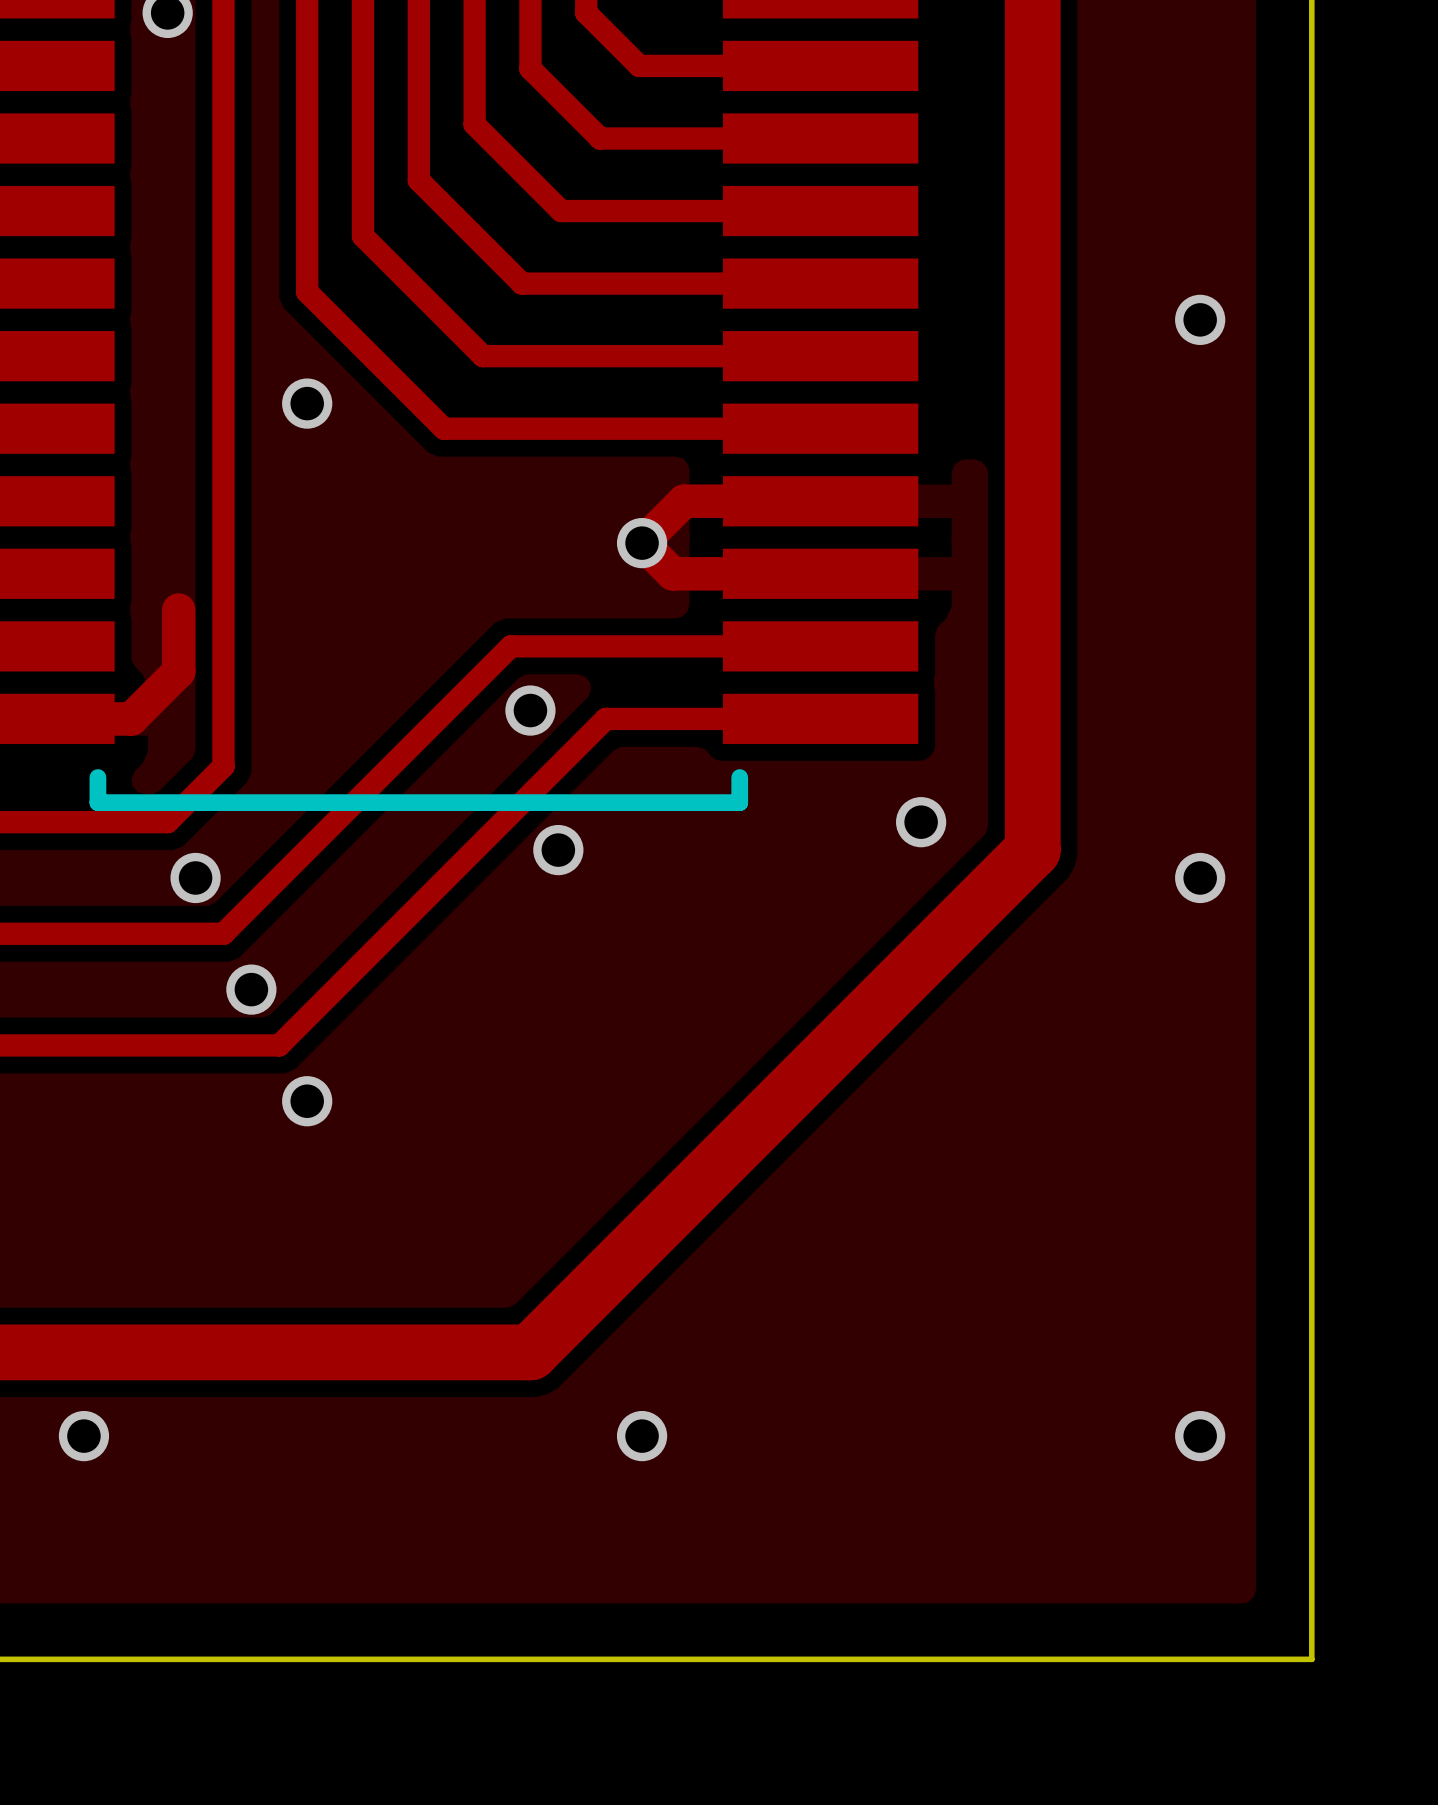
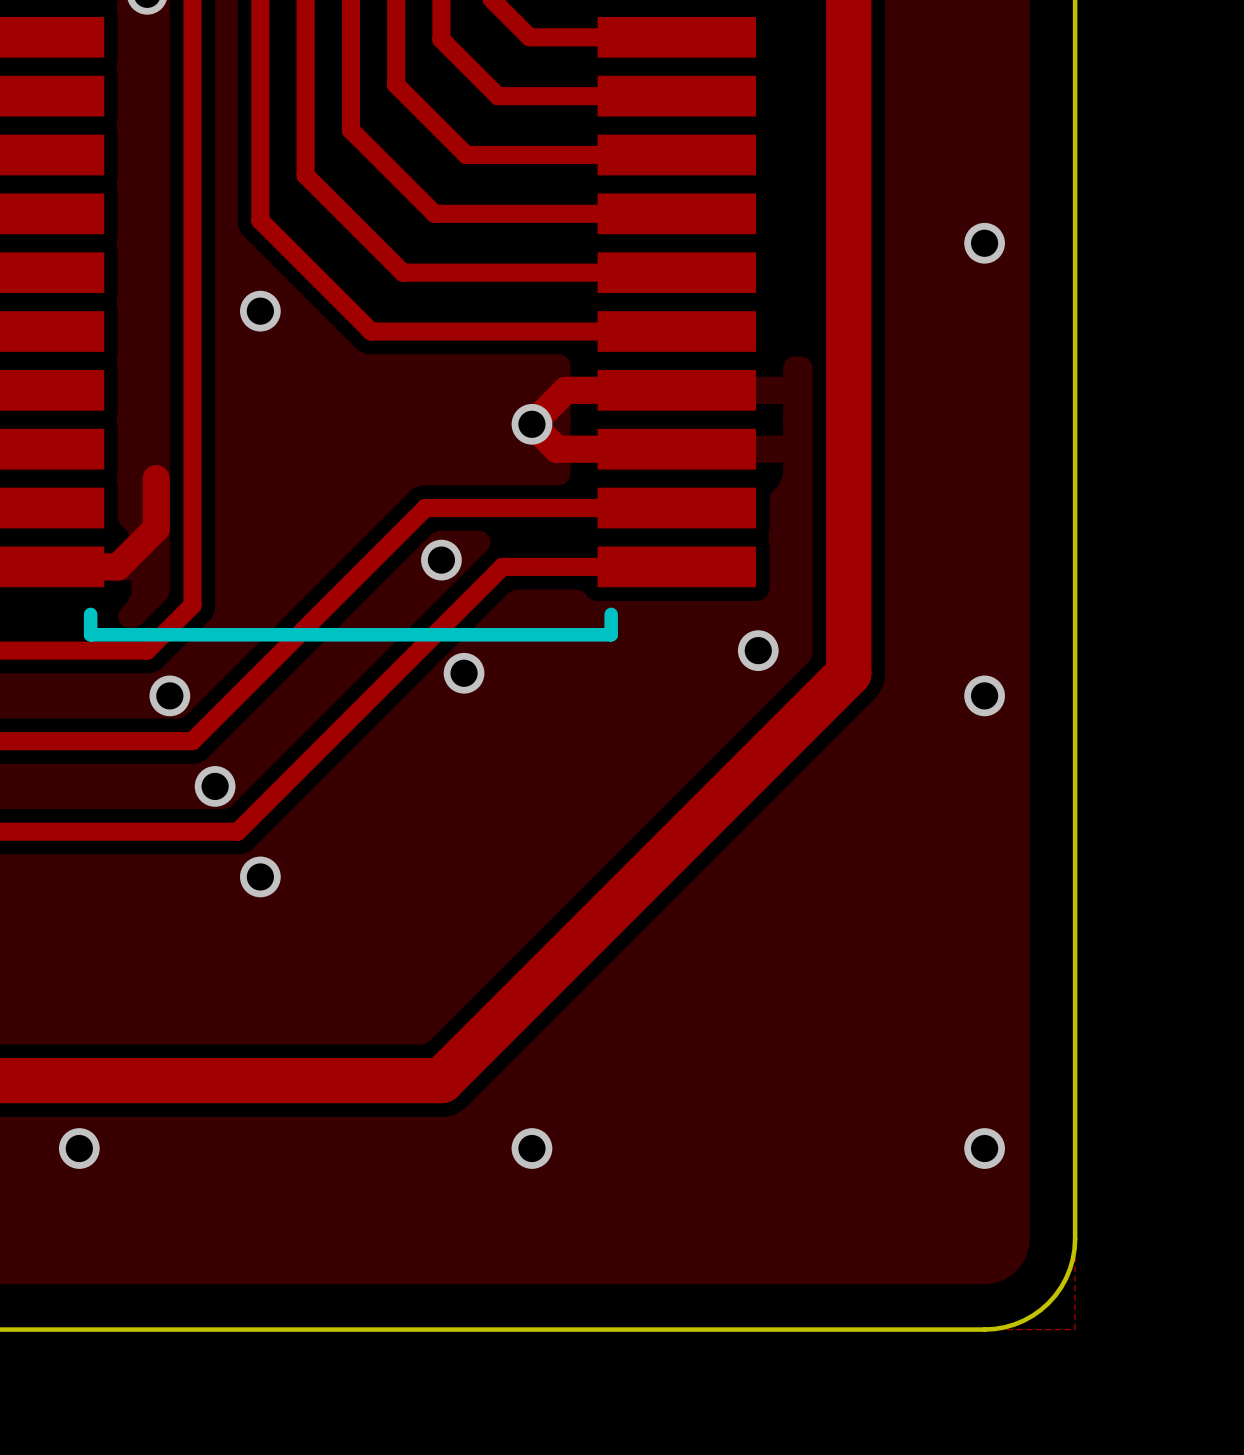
board edge: (1311, 1547) (1311, 1659) (1200, 1659) -> (1075, 1239) (1070, 1268) (1061, 1287) (1048, 1303) (1032, 1315) (1014, 1324) (984, 1329)

